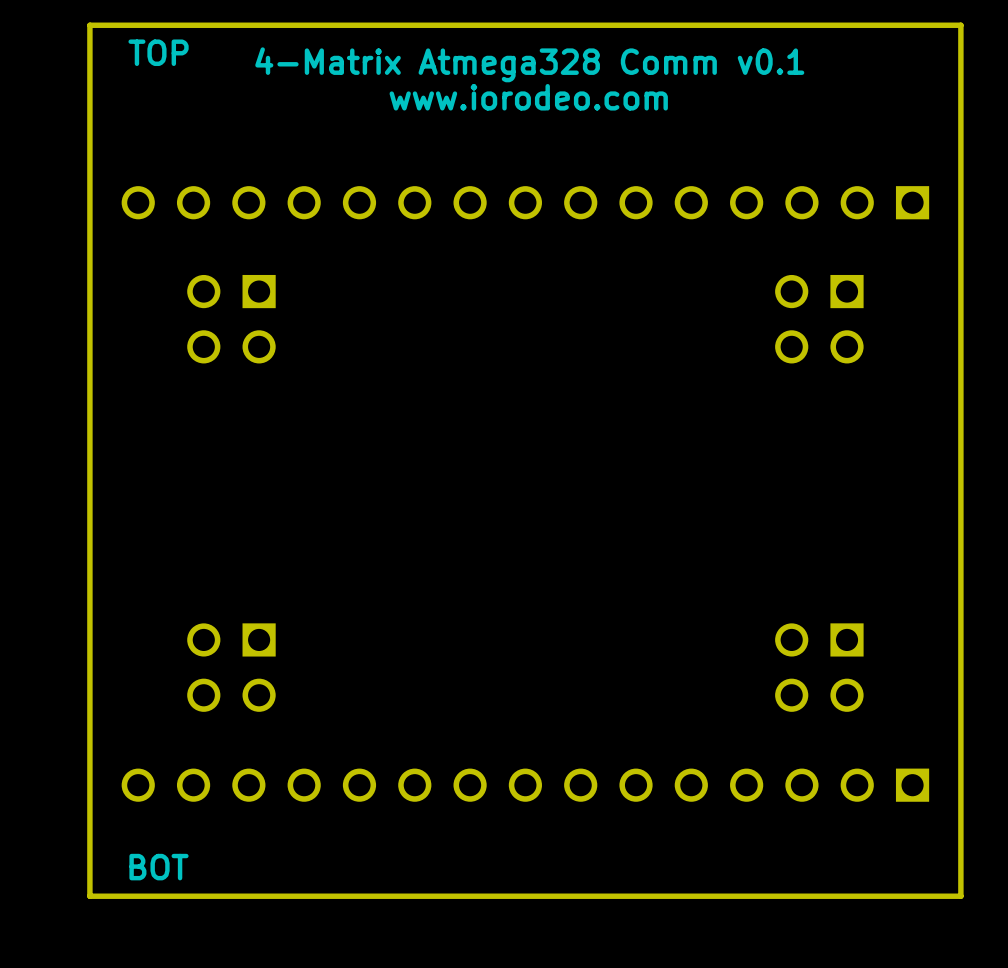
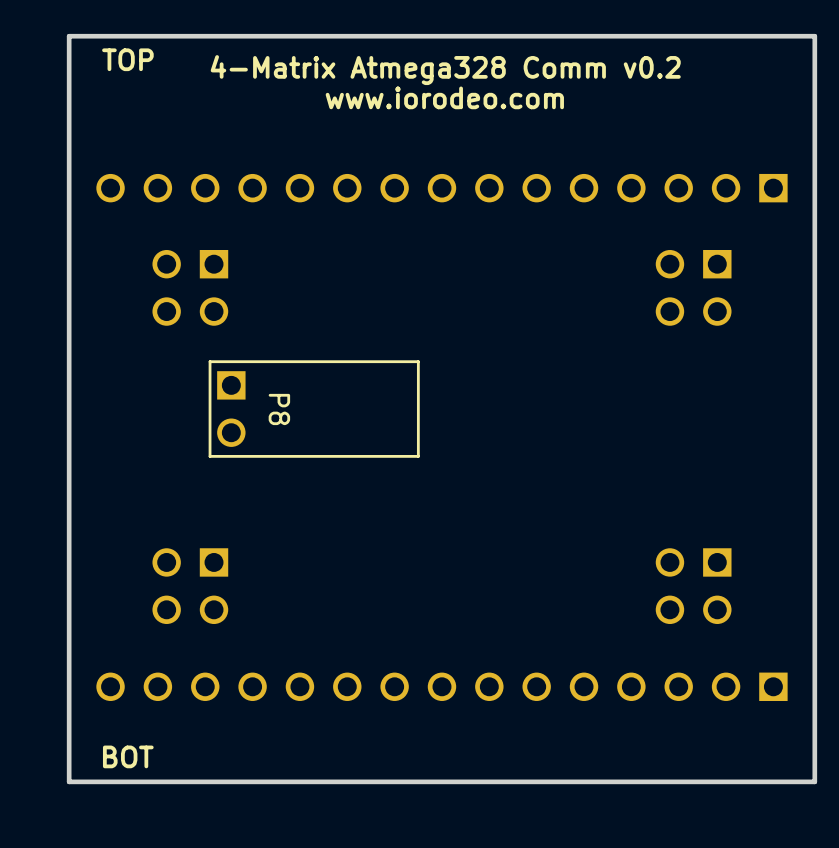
text: 4-Matrix Atmega328 Comm v0.1 (529, 64) -> 4-Matrix Atmega328 Comm v0.2 (445, 70)
P8: none -> (314, 409)

